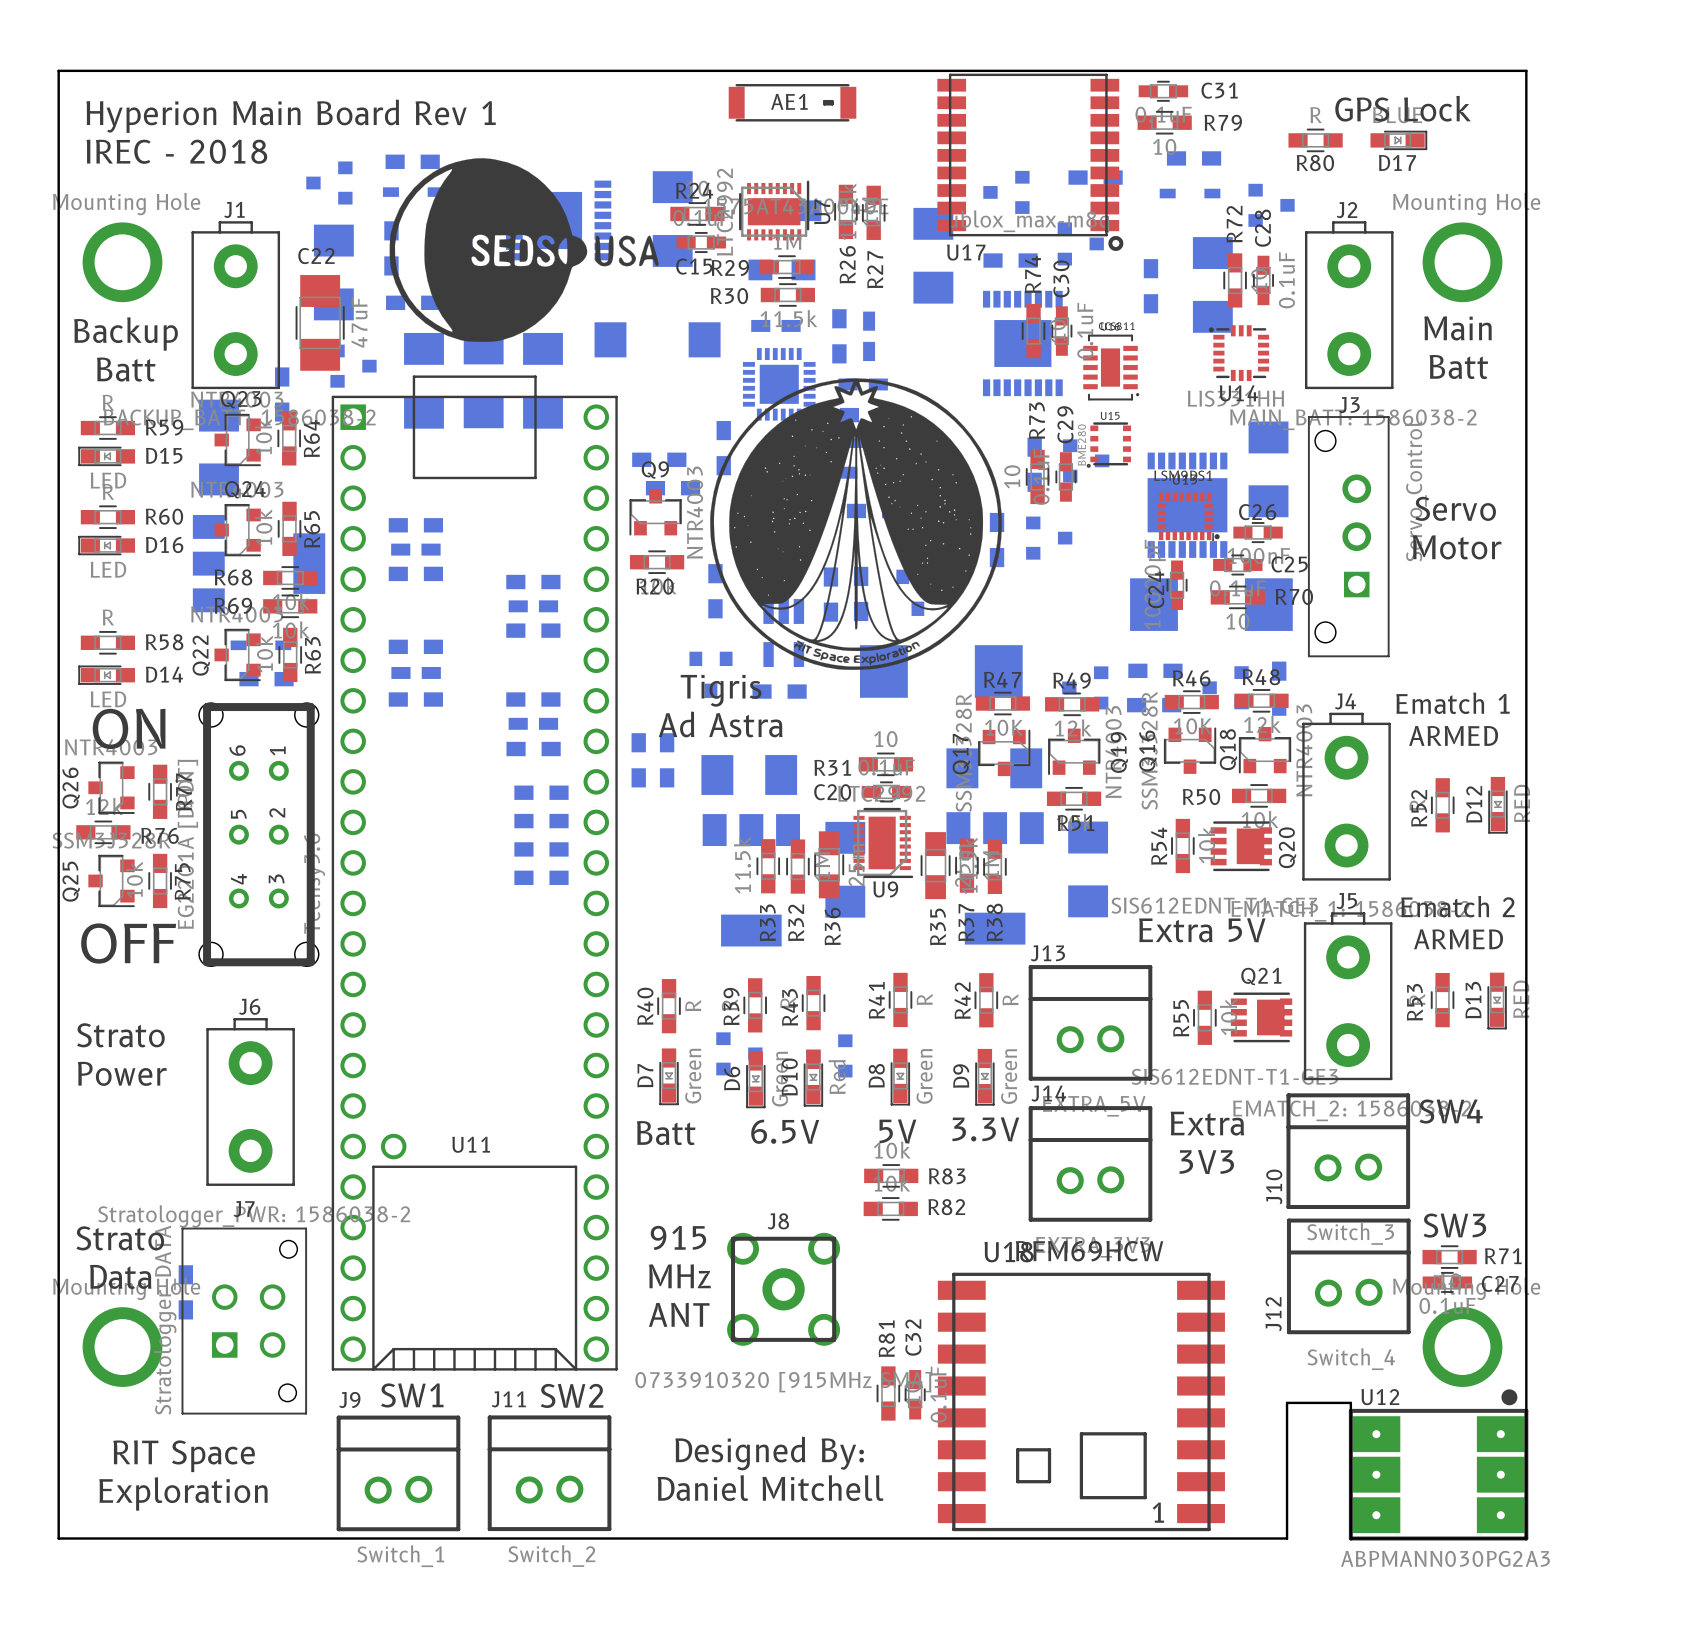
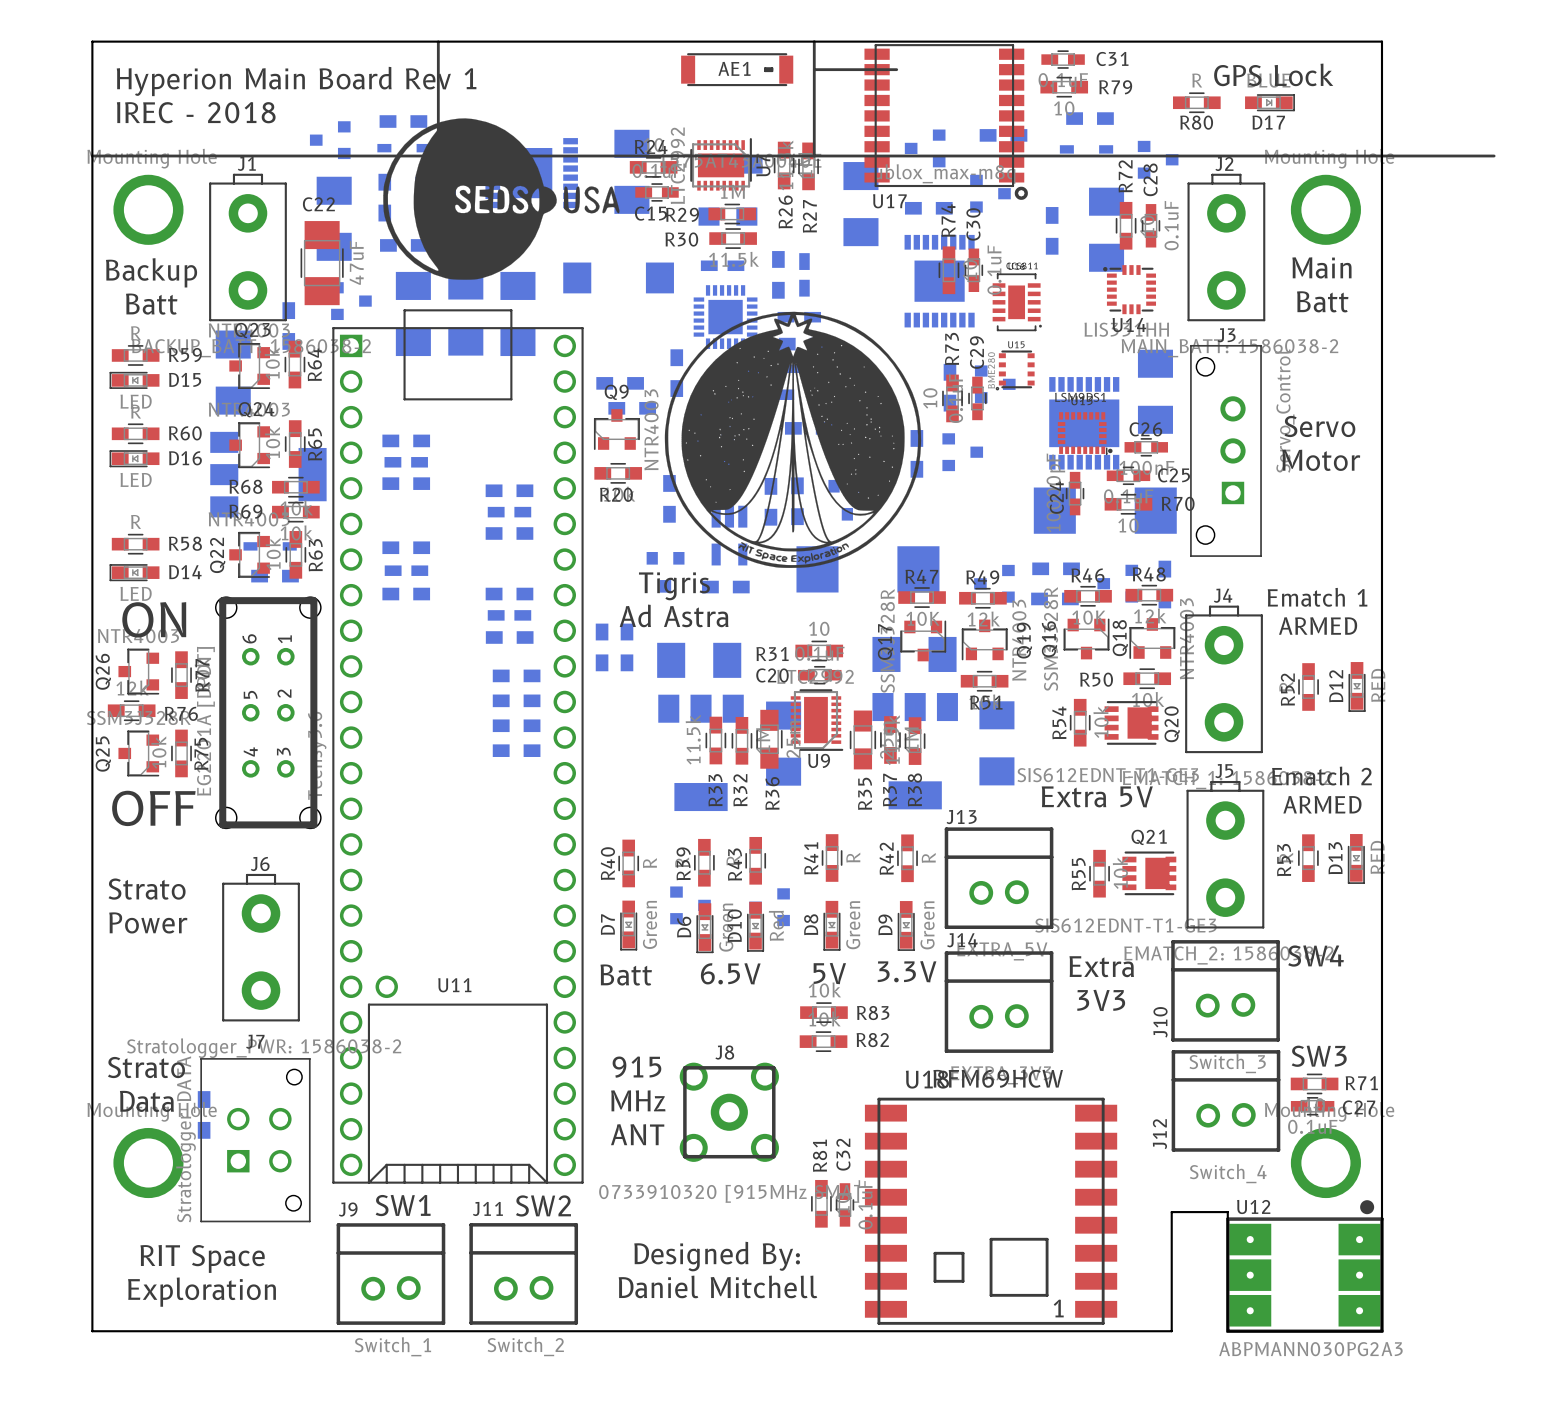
line: none -> (814, 41) (814, 156)
line: none -> (438, 42) (438, 157)
line: none -> (814, 69) (896, 69)
line: none -> (92, 156) (1494, 156)

